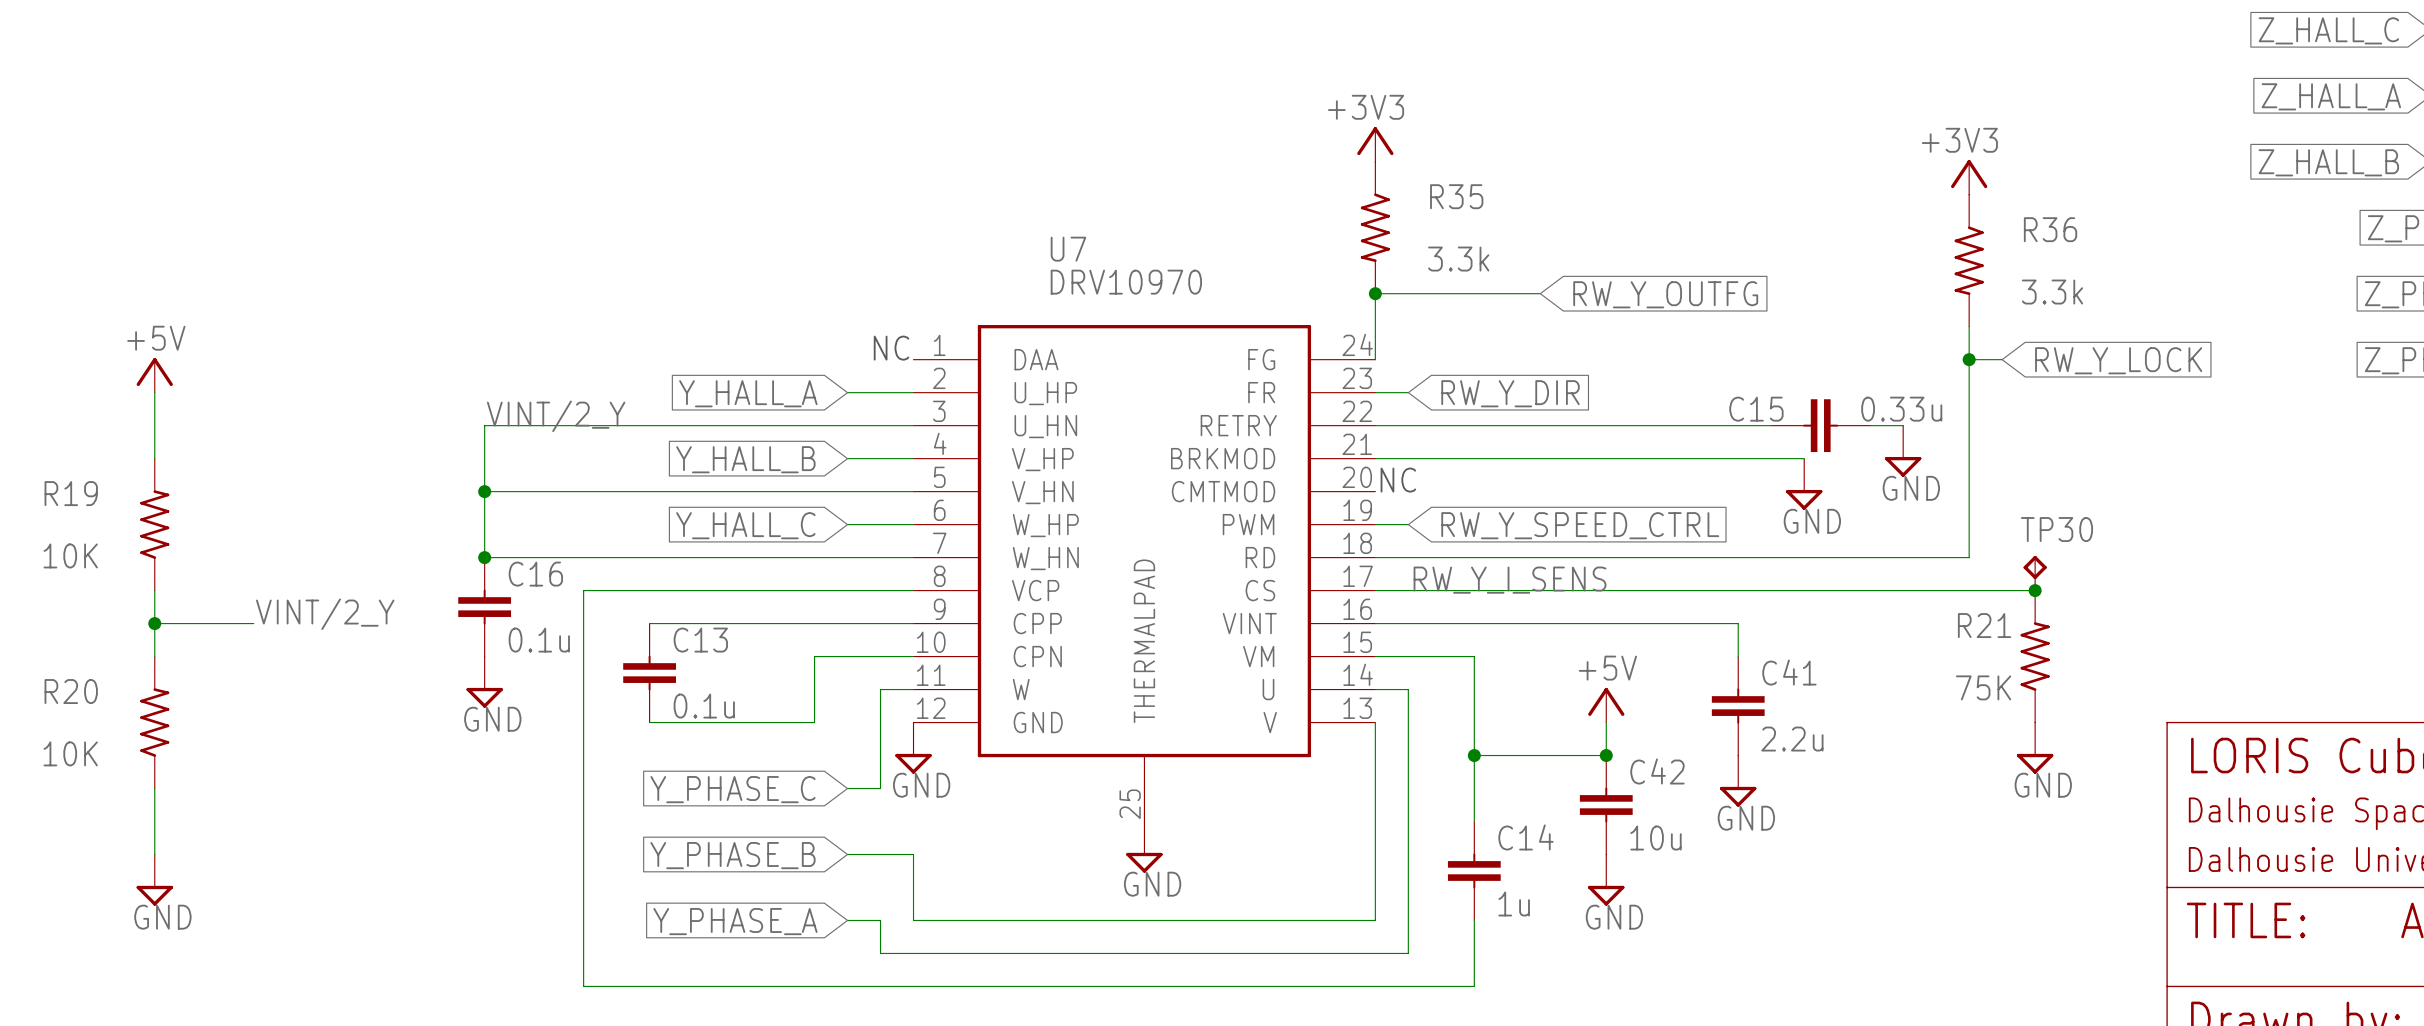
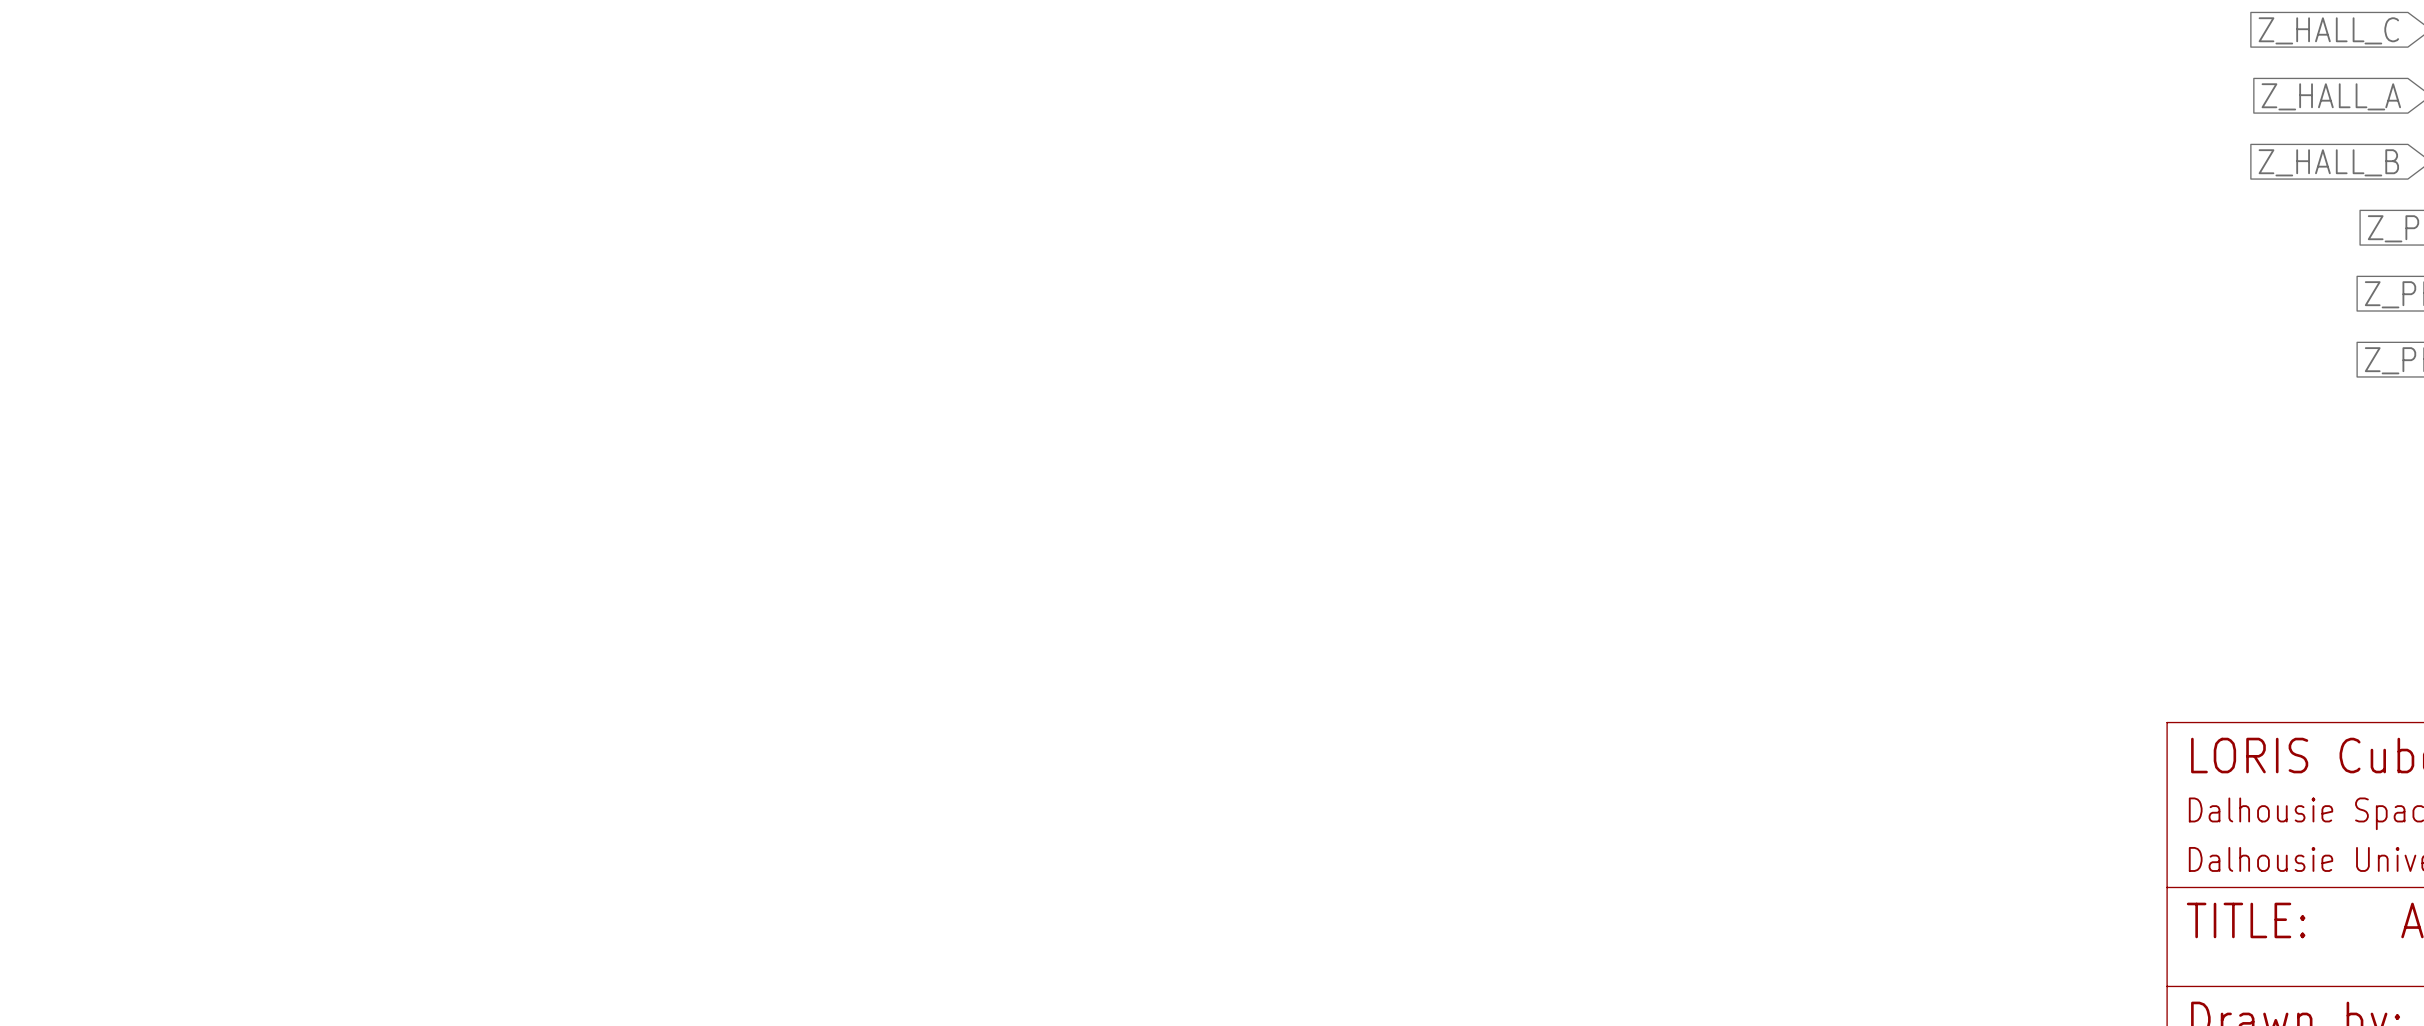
power symbol: +3V3 (1375, 144) -> none
power symbol: +3V3 (1969, 177) -> none
R35: 3.3k (1375, 227) -> none
R36: 3.3k (1969, 260) -> none
junction: (1375, 293) -> none
wire: (1540, 293) (1375, 293) (1375, 359) -> none
global label: RW_Y_OUTFG (1665, 294) -> none
wire: (1969, 326) (1969, 557) (1375, 557) -> none
text: NC (891, 348) -> none
wire: (1969, 359) (2002, 359) -> none
junction: (1969, 359) -> none
global label: RW_Y_LOCK (2118, 360) -> none
power symbol: +5V (154, 375) -> none
wire: (154, 392) (154, 458) -> none
wire: (847, 392) (913, 392) -> none
wire: (1375, 392) (1408, 392) -> none
global label: Y_HALL_A (748, 393) -> none
global label: RW_Y_DIR (1510, 393) -> none
label: VINT/2_Y (556, 416) -> none
wire: (913, 425) (484, 425) (484, 557) (913, 557) -> none
wire: (1375, 425) (1771, 425) -> none
C15: 0.33u (1820, 425) -> none
wire: (1870, 425) (1903, 425) -> none
power symbol: GND (1903, 451) -> none
wire: (847, 458) (913, 458) -> none
wire: (1375, 458) (1804, 458) -> none
global label: Y_HALL_B (745, 459) -> none
text: NC (1398, 480) -> none
power symbol: GND (1804, 484) -> none
wire: (484, 491) (913, 491) -> none
junction: (484, 491) -> none
R19: 10K (154, 524) -> none
wire: (847, 524) (913, 524) -> none
wire: (1375, 524) (1408, 524) -> none
global label: Y_HALL_C (745, 525) -> none
global label: RW_Y_SPEED_CTRL (1580, 525) -> none
junction: (484, 557) -> none
U7: (1144, 573) -> none
TP30: (2035, 573) -> none
label: RW_Y_I_SENS (1510, 580) -> none
wire: (154, 590) (154, 656) -> none
wire: (913, 590) (583, 590) (583, 986) (1474, 986) (1474, 920) -> none
wire: (1375, 590) (2035, 590) -> none
junction: (2035, 590) -> none
C16: 0.1u (484, 607) -> none
label: VINT/2_Y (325, 614) -> none
wire: (154, 623) (253, 623) -> none
junction: (154, 623) -> none
wire: (649, 623) (913, 623) -> none
wire: (1375, 623) (1738, 623) (1738, 656) -> none
wire: (913, 656) (814, 656) (814, 722) (649, 722) -> none
wire: (1375, 656) (1474, 656) (1474, 821) -> none
R21: 75K (2035, 656) -> none
C13: 0.1u (649, 673) -> none
power symbol: GND (484, 682) -> none
wire: (913, 689) (880, 689) (880, 788) (847, 788) -> none
wire: (1375, 689) (1408, 689) (1408, 953) (880, 953) (880, 920) (847, 920) -> none
power symbol: +5V (1606, 705) -> none
C41: 2.2u (1738, 706) -> none
R20: 10K (154, 722) -> none
wire: (1375, 722) (1375, 920) (913, 920) (913, 854) (847, 854) -> none
wire: (1606, 722) (1606, 755) (1474, 755) -> none
power symbol: GND (913, 748) -> none
power symbol: GND (2035, 748) -> none
junction: (1474, 755) -> none
junction: (1606, 755) -> none
power symbol: GND (1738, 781) -> none
wire: (154, 788) (154, 854) -> none
global label: Y_PHASE_C (733, 789) -> none
C42: 10u (1606, 805) -> none
power symbol: GND (1144, 847) -> none
global label: Y_PHASE_B (733, 855) -> none
C14: 1u (1474, 870) -> none
power symbol: GND (154, 880) -> none
power symbol: GND (1606, 880) -> none
global label: Y_PHASE_A (735, 921) -> none

